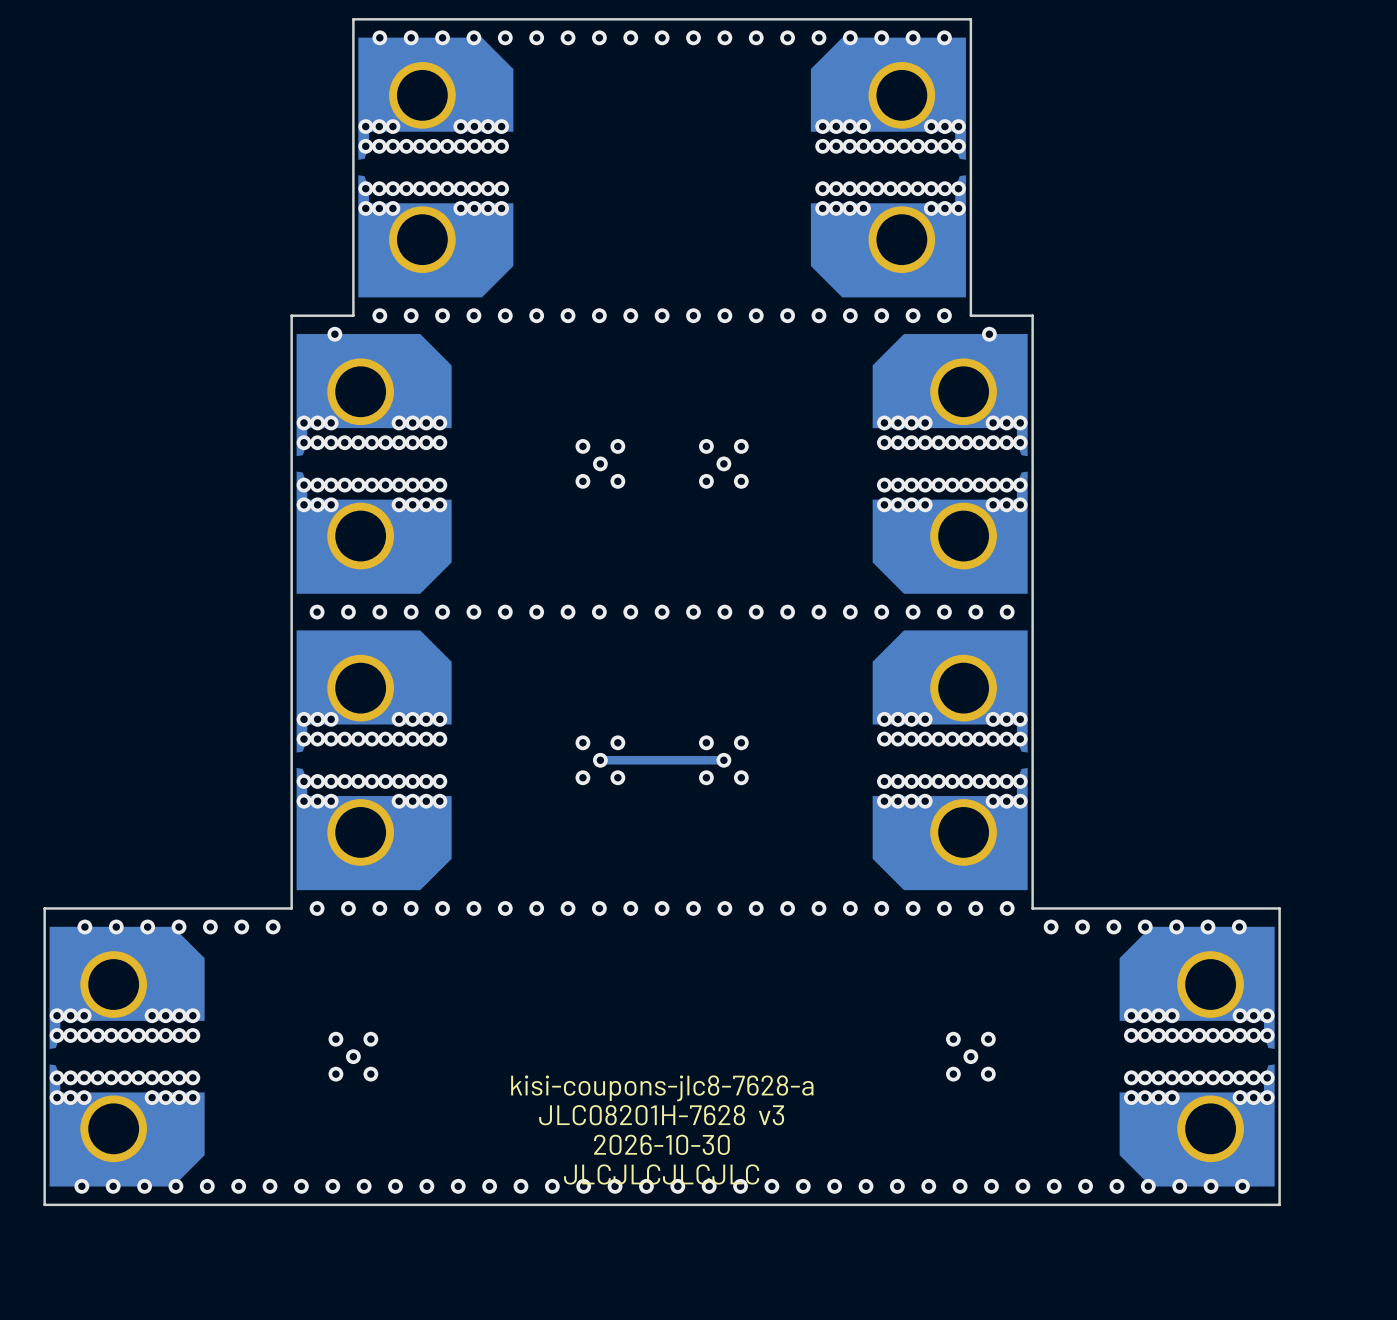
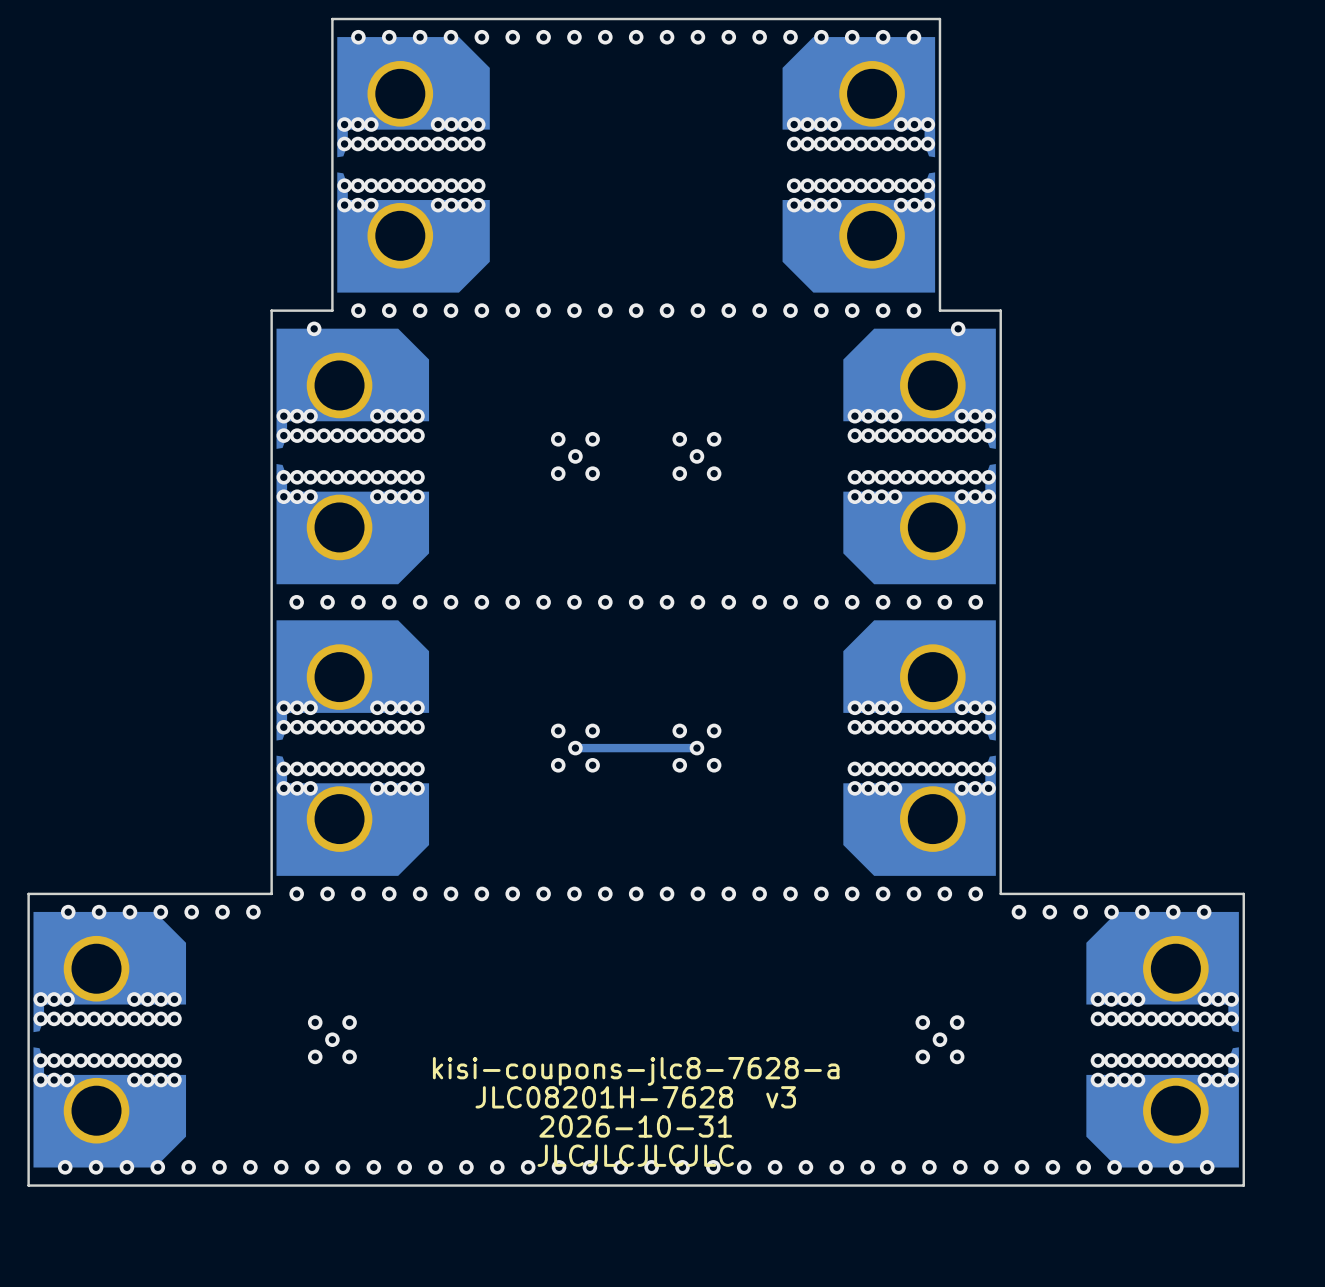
text: 2026-10-30 (661, 1144) -> 2026-10-31 (635, 1126)

